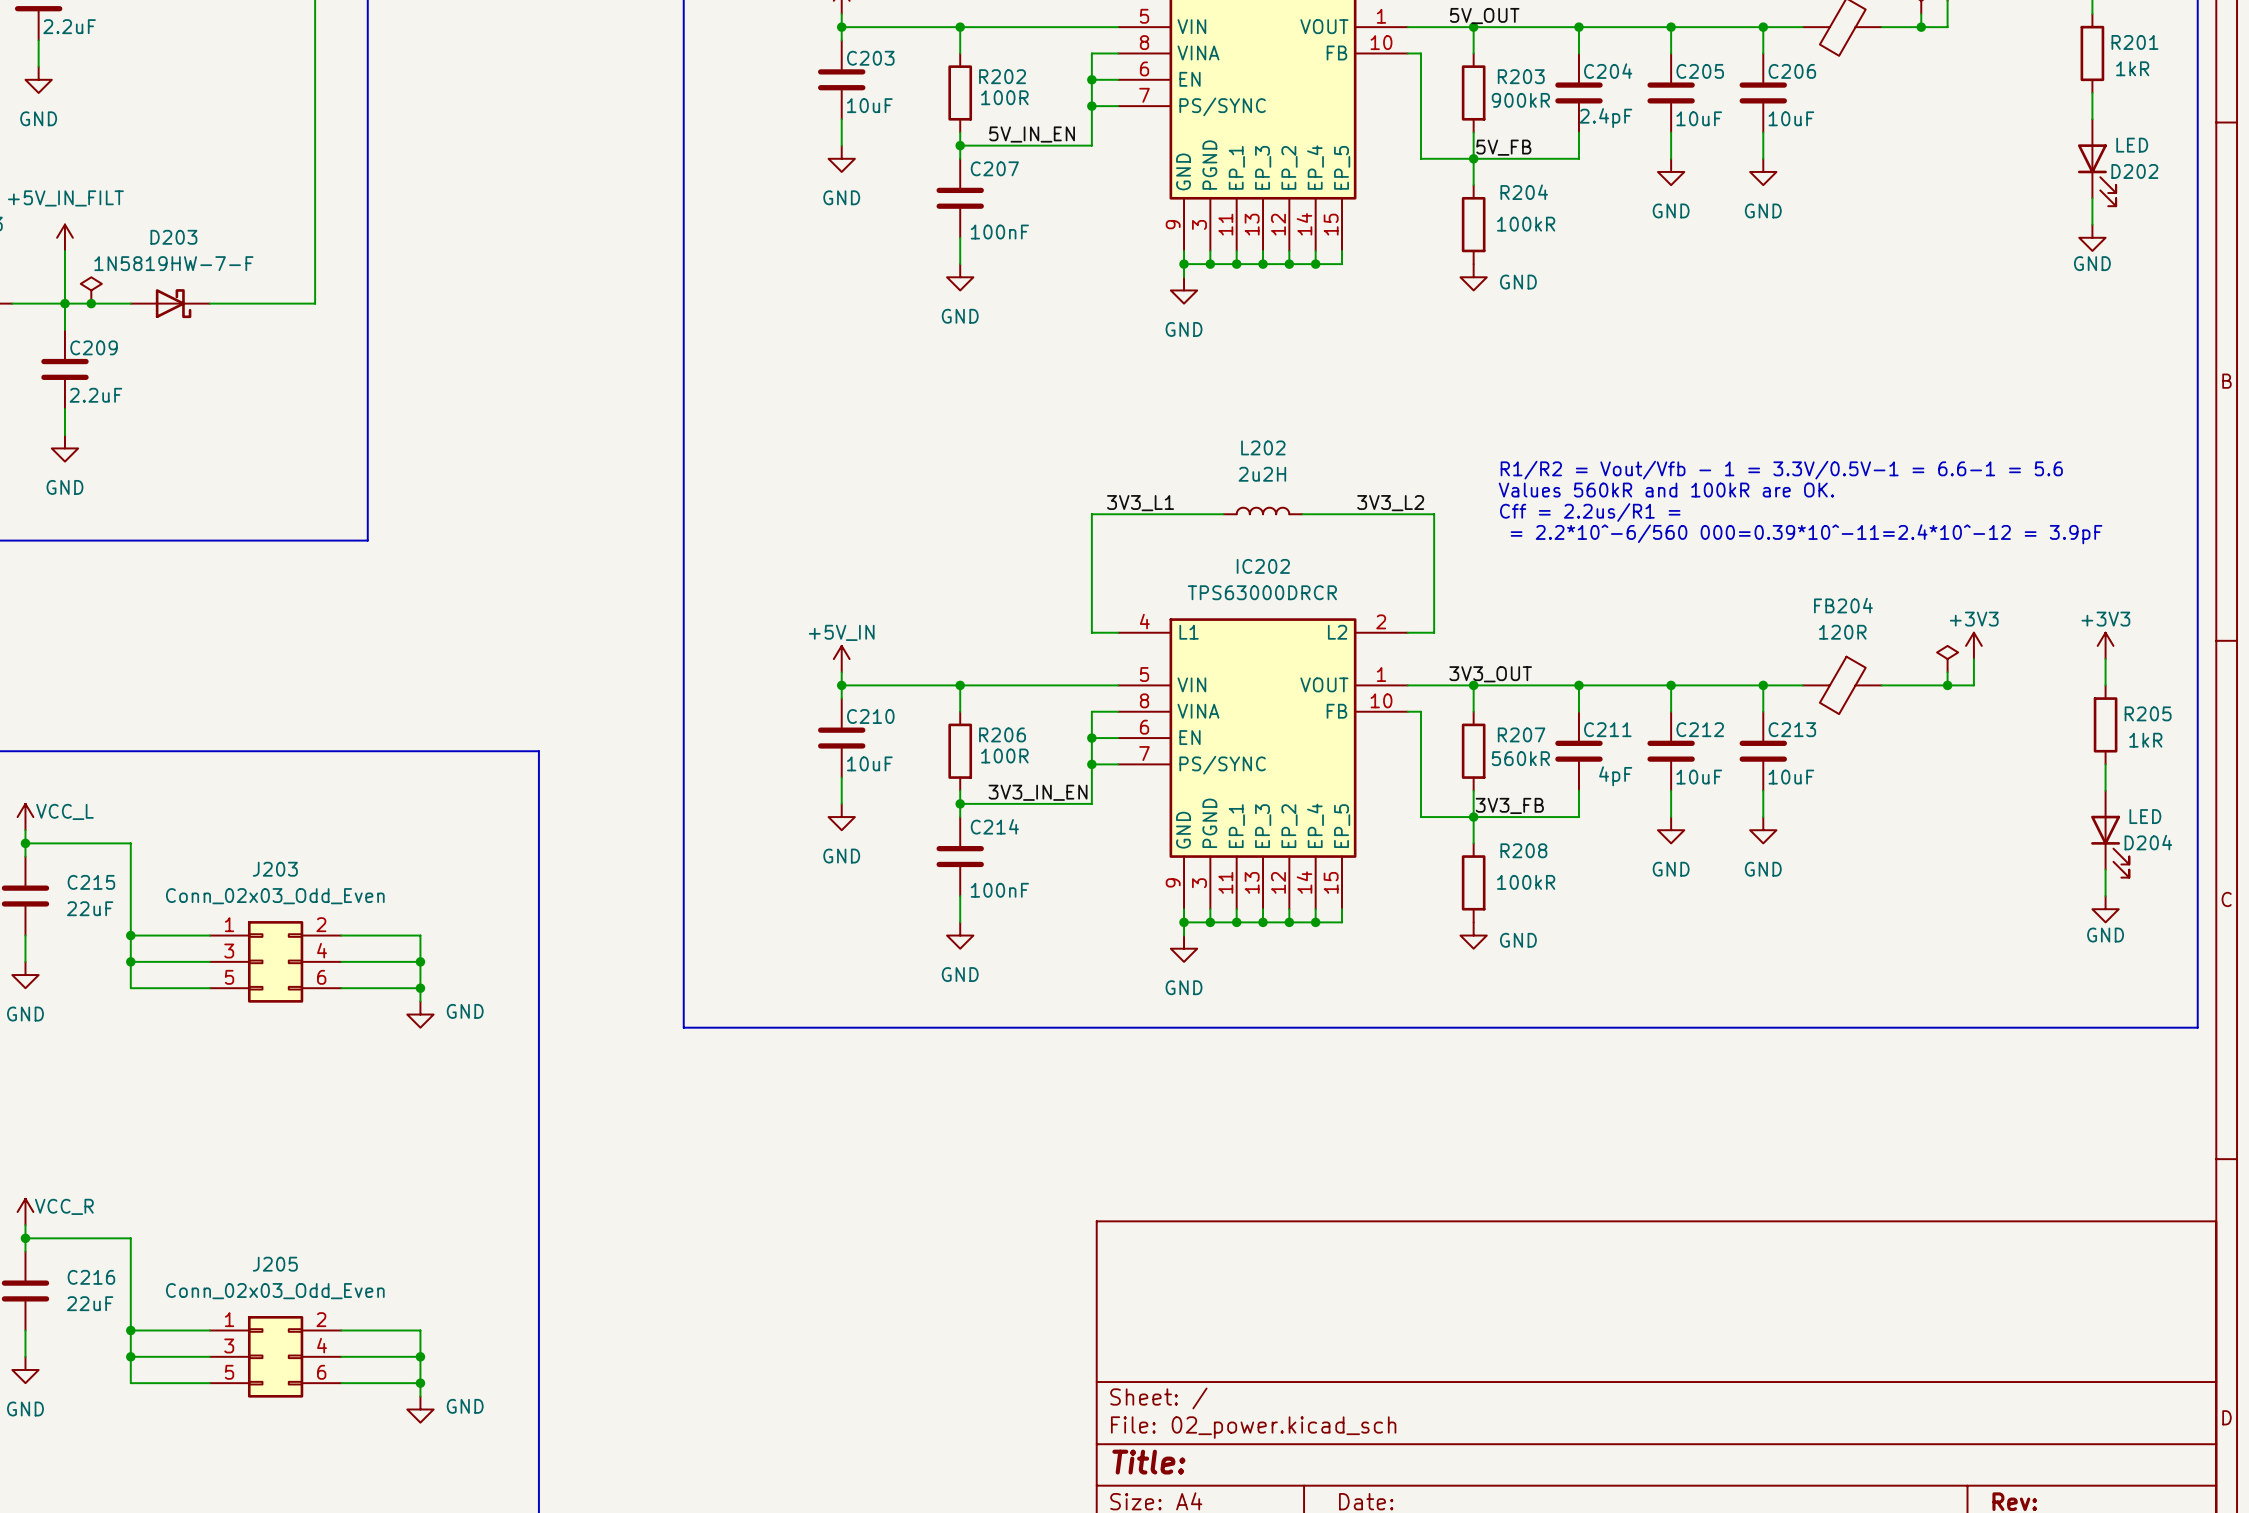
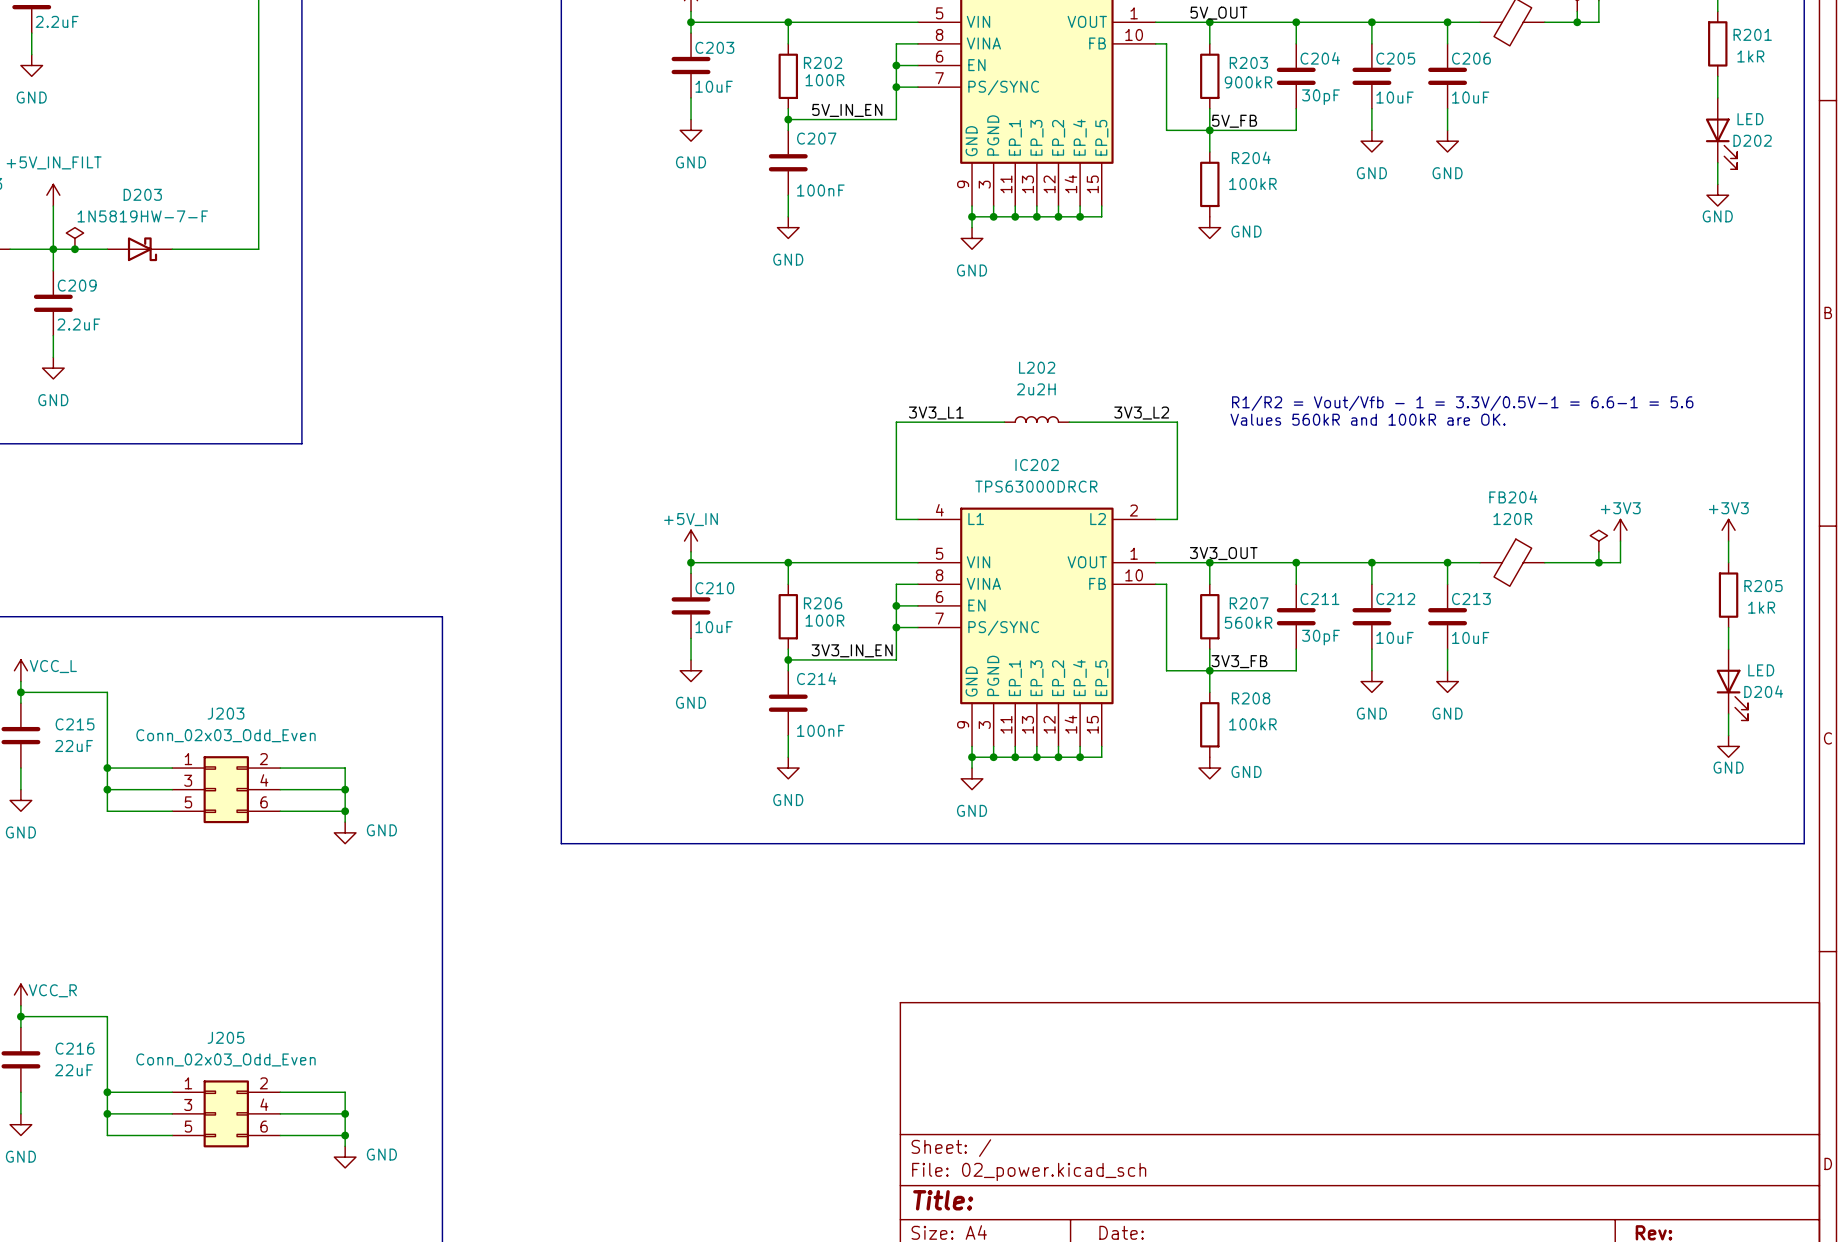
C204 value: 2.4pF (1605, 118) -> 30pF (1320, 97)
text: R1/R2 = Vout/Vfb - 1 = 3.3V/0.5V-1 = 6.6-1 = 5.6 (1781, 470) -> none
text: Values 560kR and 100kR are OK. (1666, 490) -> R1/R2 = Vout/Vfb - 1 = 3.3V/0.5V-1 = 6.6-1 = 5.6 (1462, 403)
text: Cff = 2.2us/R1 = (1590, 512) -> Values 560kR and 100kR are OK. (1368, 419)
text: = 2.2*10^-6/560 000=0.39*10^-11=2.4*10^-12 = 3.9pF (1806, 534) -> none
C211 value: 4pF (1615, 776) -> 30pF (1320, 637)

